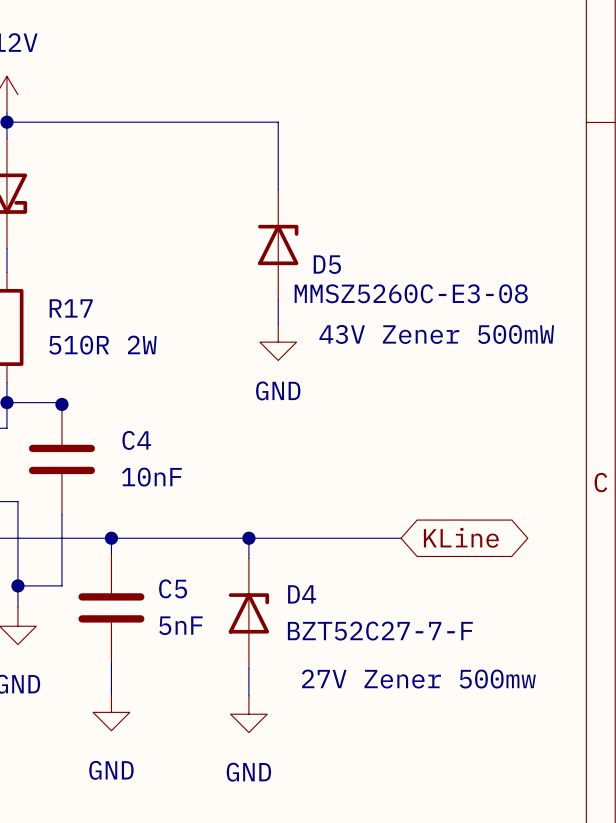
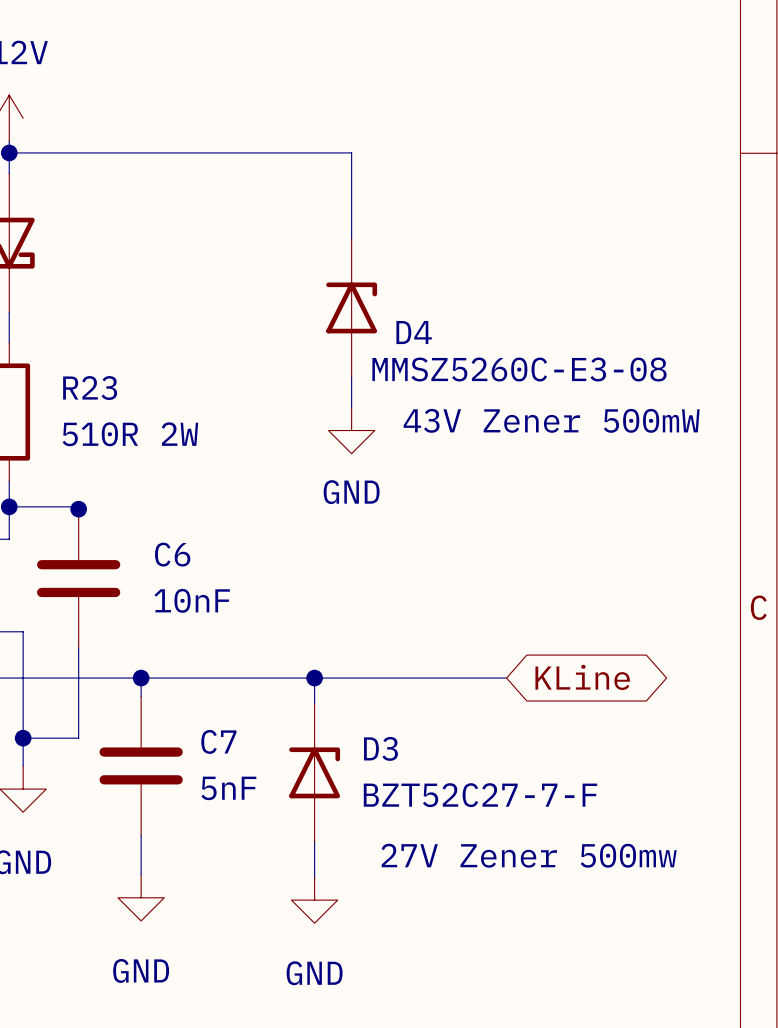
D5 name: D5 (327, 264) -> D4 (414, 332)
R17 name: R17 (71, 308) -> R23 (90, 388)
C4 name: C4 (136, 440) -> C6 (172, 554)
C5 name: C5 (173, 588) -> C7 (218, 741)
D4 name: D4 (302, 594) -> D3 (380, 748)

